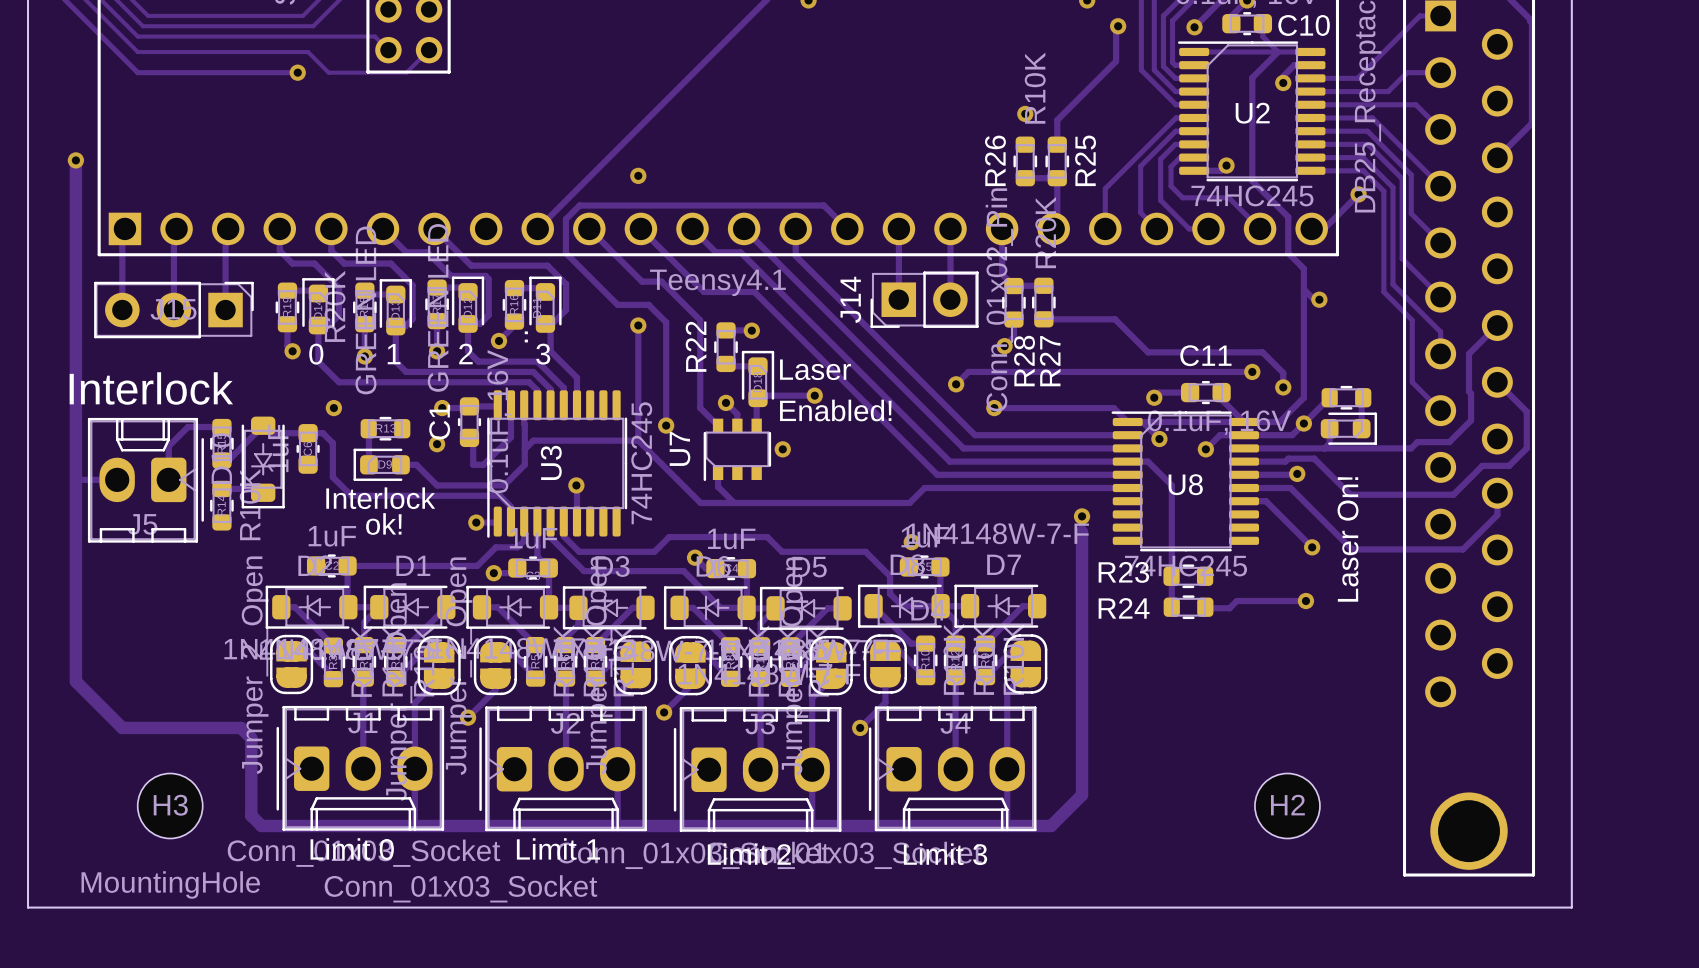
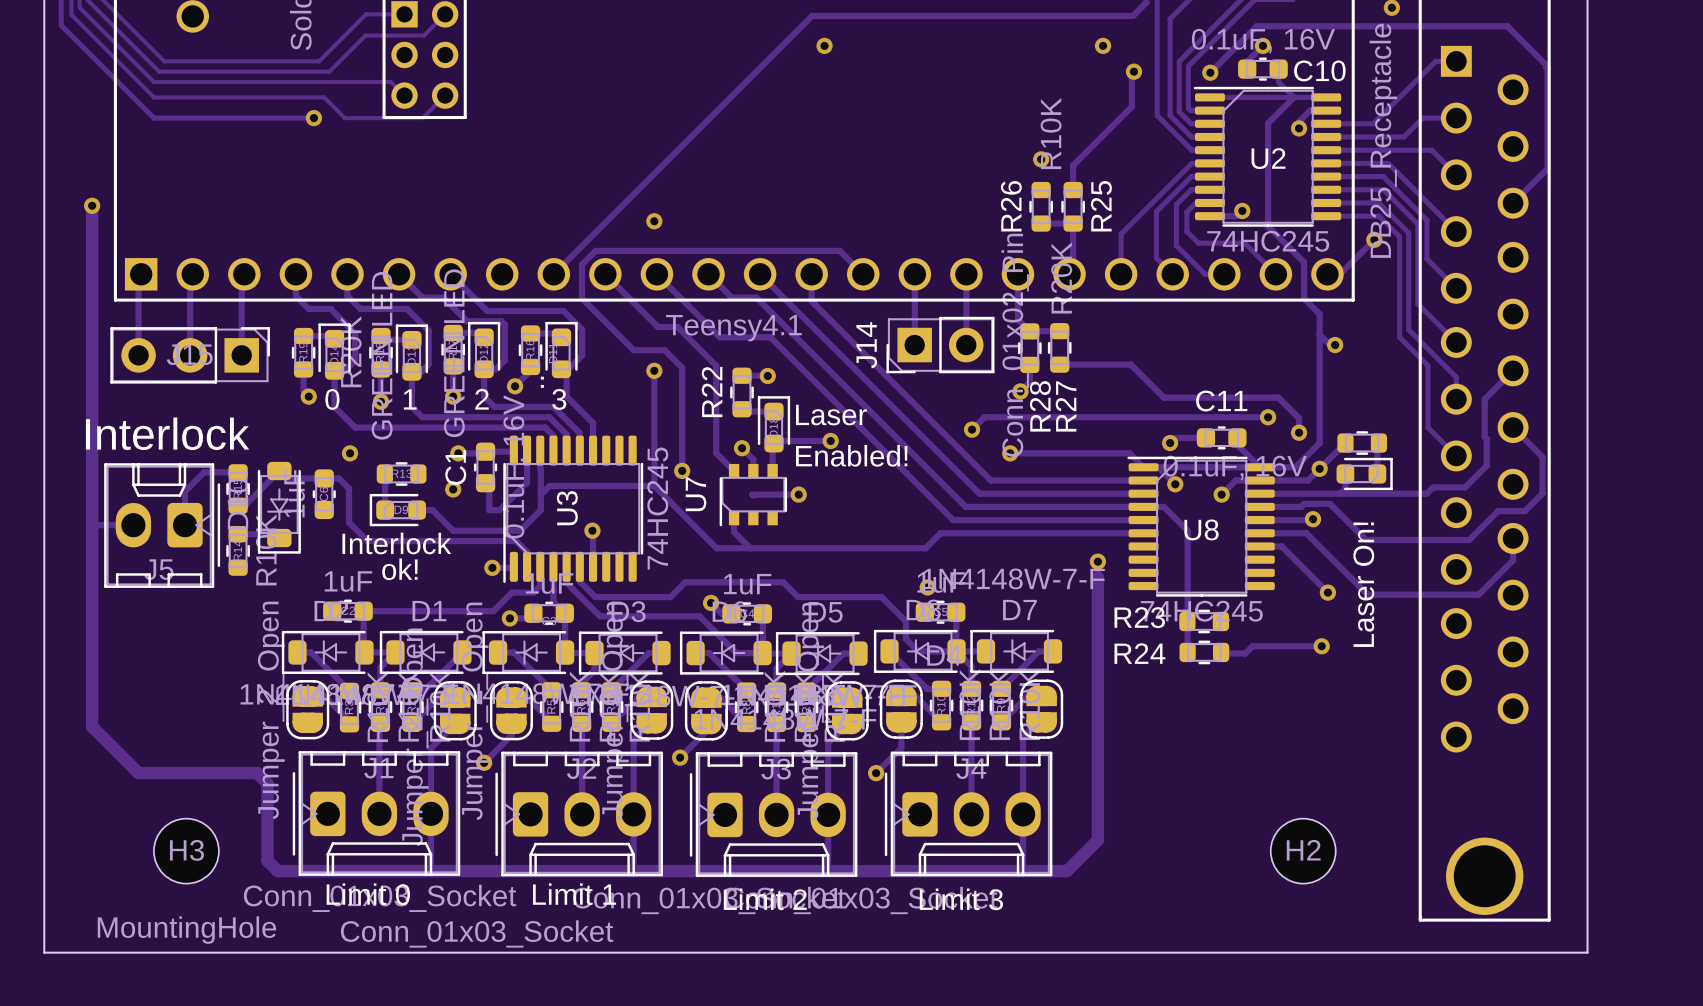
track: none -> (798, 494) (753, 495)

